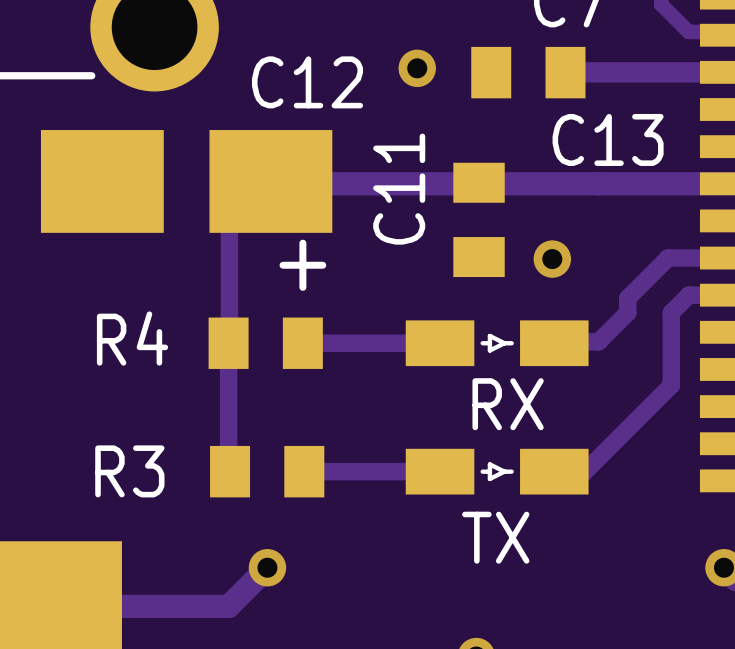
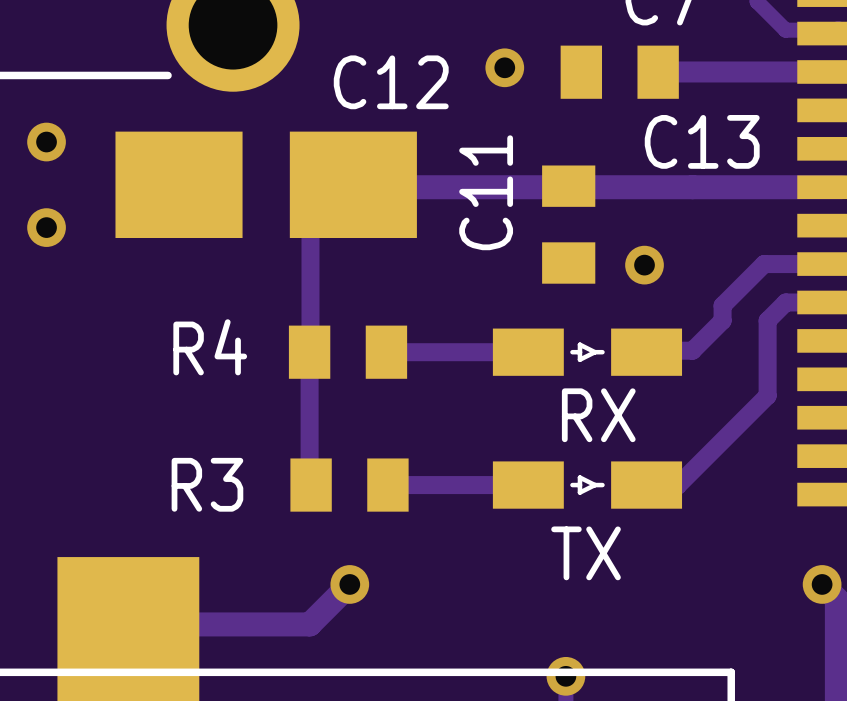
text: + (302, 265) -> none

